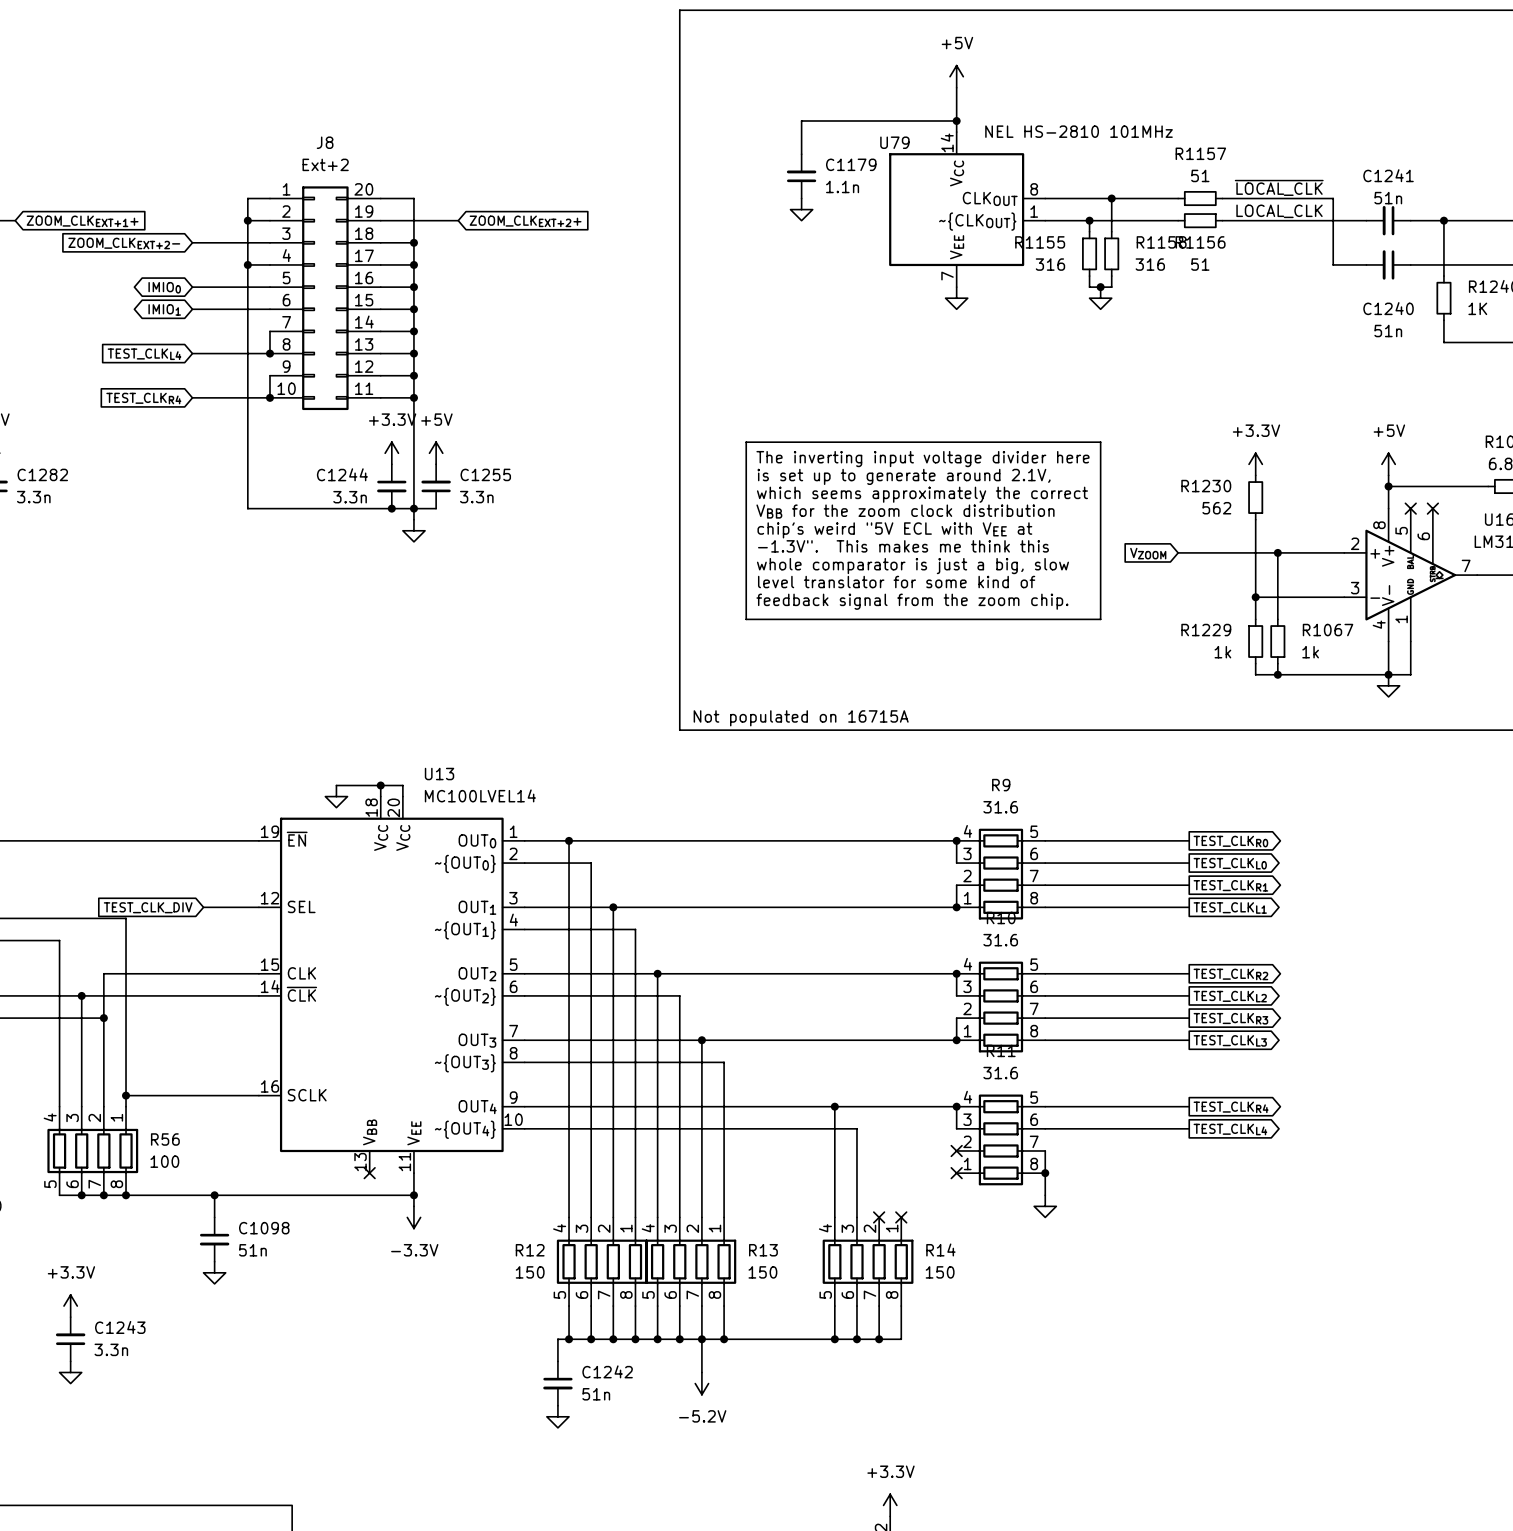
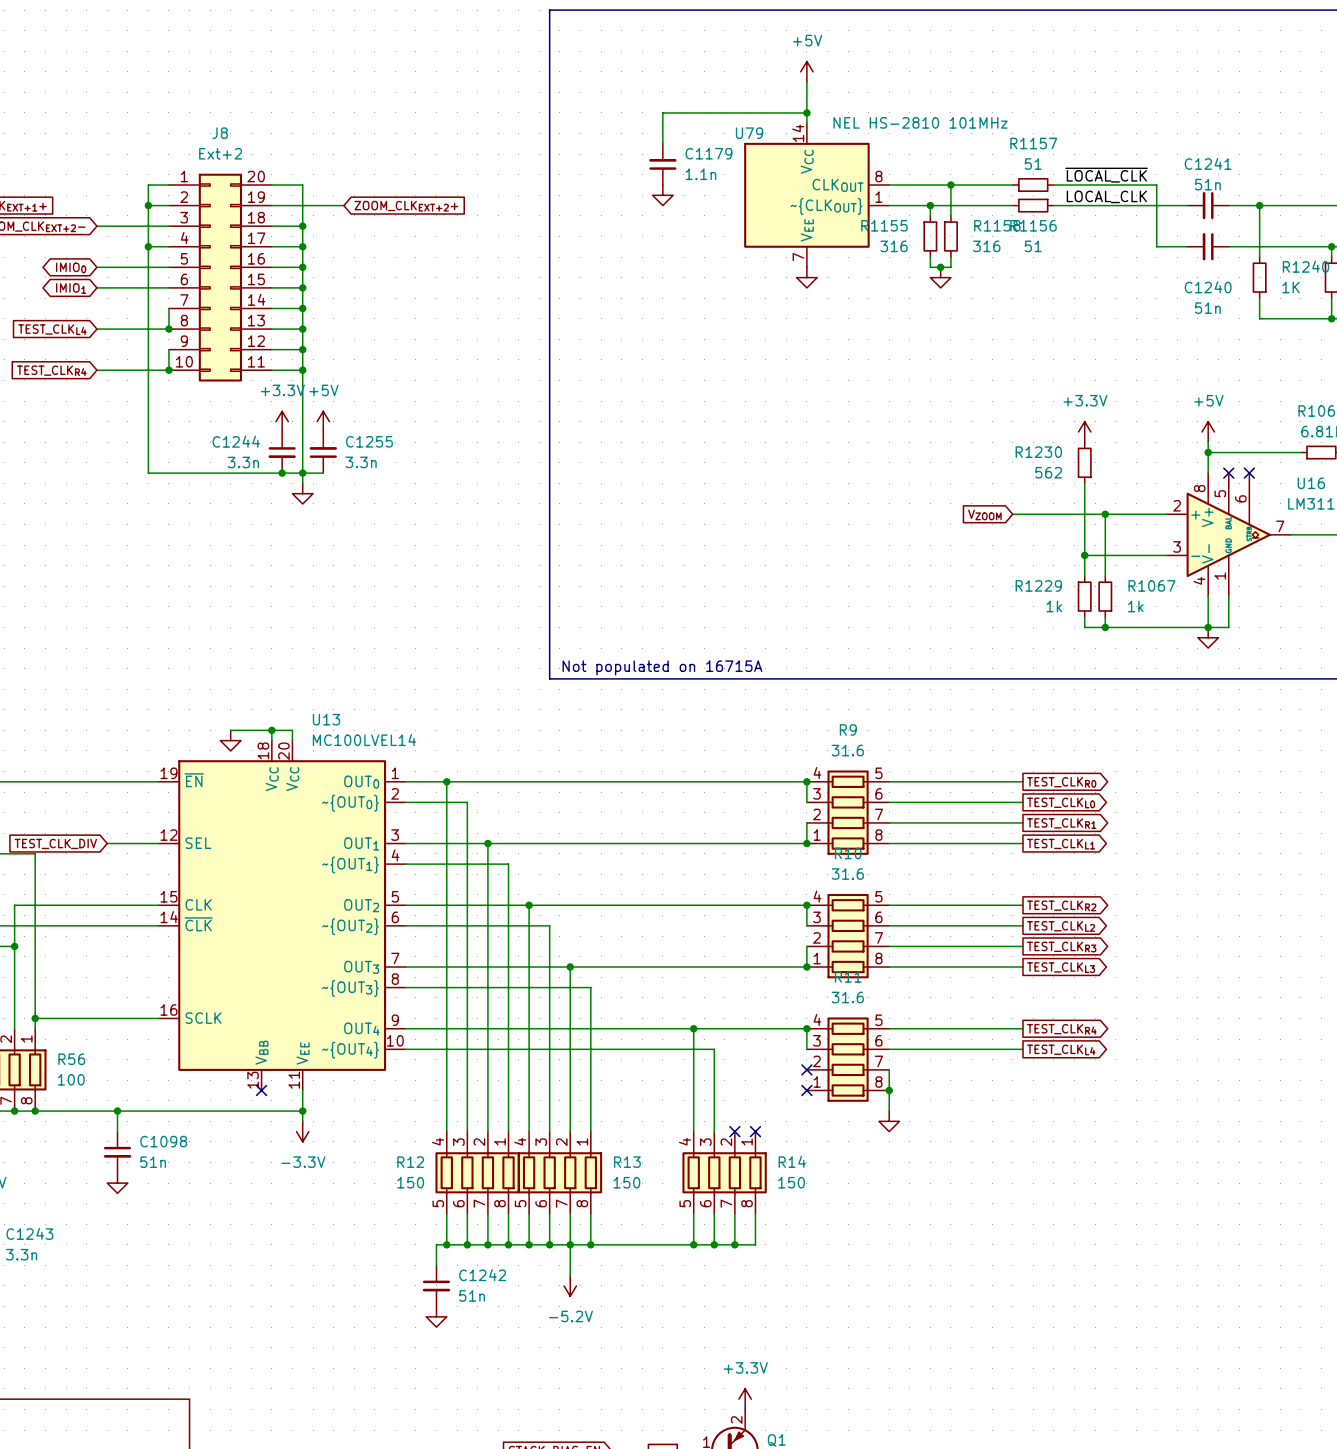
line: (746, 442) (1100, 442) (1100, 619) (746, 619) (746, 442) -> none
text: The inverting input voltage divider here (922, 459) -> none
text: is set up to generate around 2.1V, (904, 476) -> none
text: which seems approximately the correct (922, 494) -> none
text: VBB for the zoom clock distribution (905, 511) -> none
text: chip's weird "5V ECL with VEE at (894, 530) -> none
text: -1.3V". This makes me think this (903, 546) -> none
text: whole comparator is just a big, slow (912, 566) -> none
text: level translator for some kind of (896, 582) -> none
text: feedback signal from the zoom chip. (912, 601) -> none

